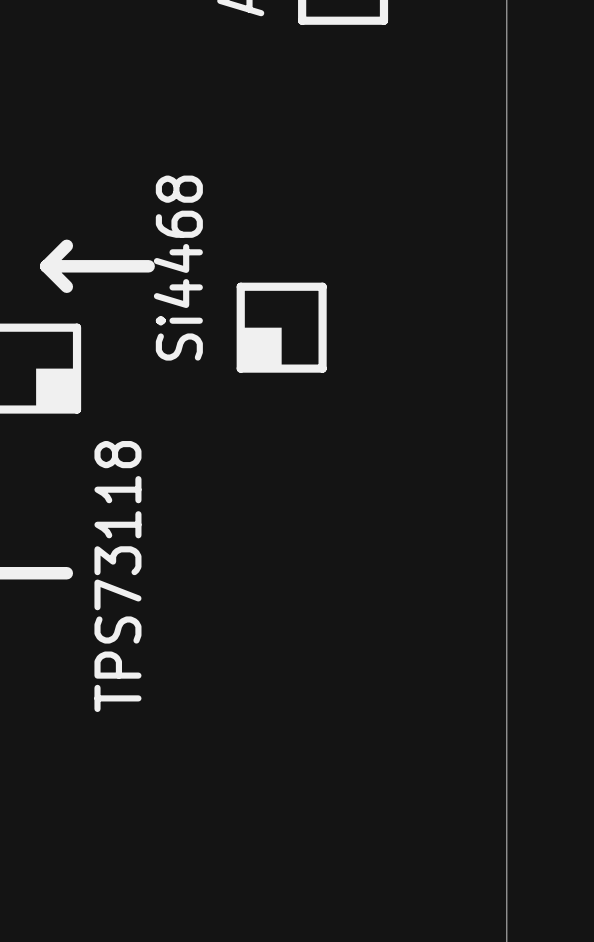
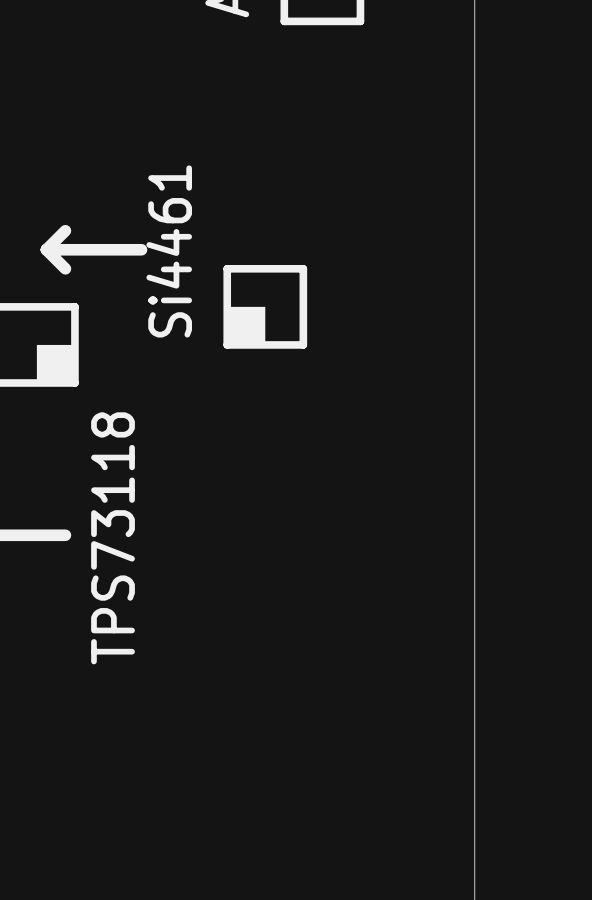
text: Si4468 (178, 268) -> Si4461 (169, 251)

